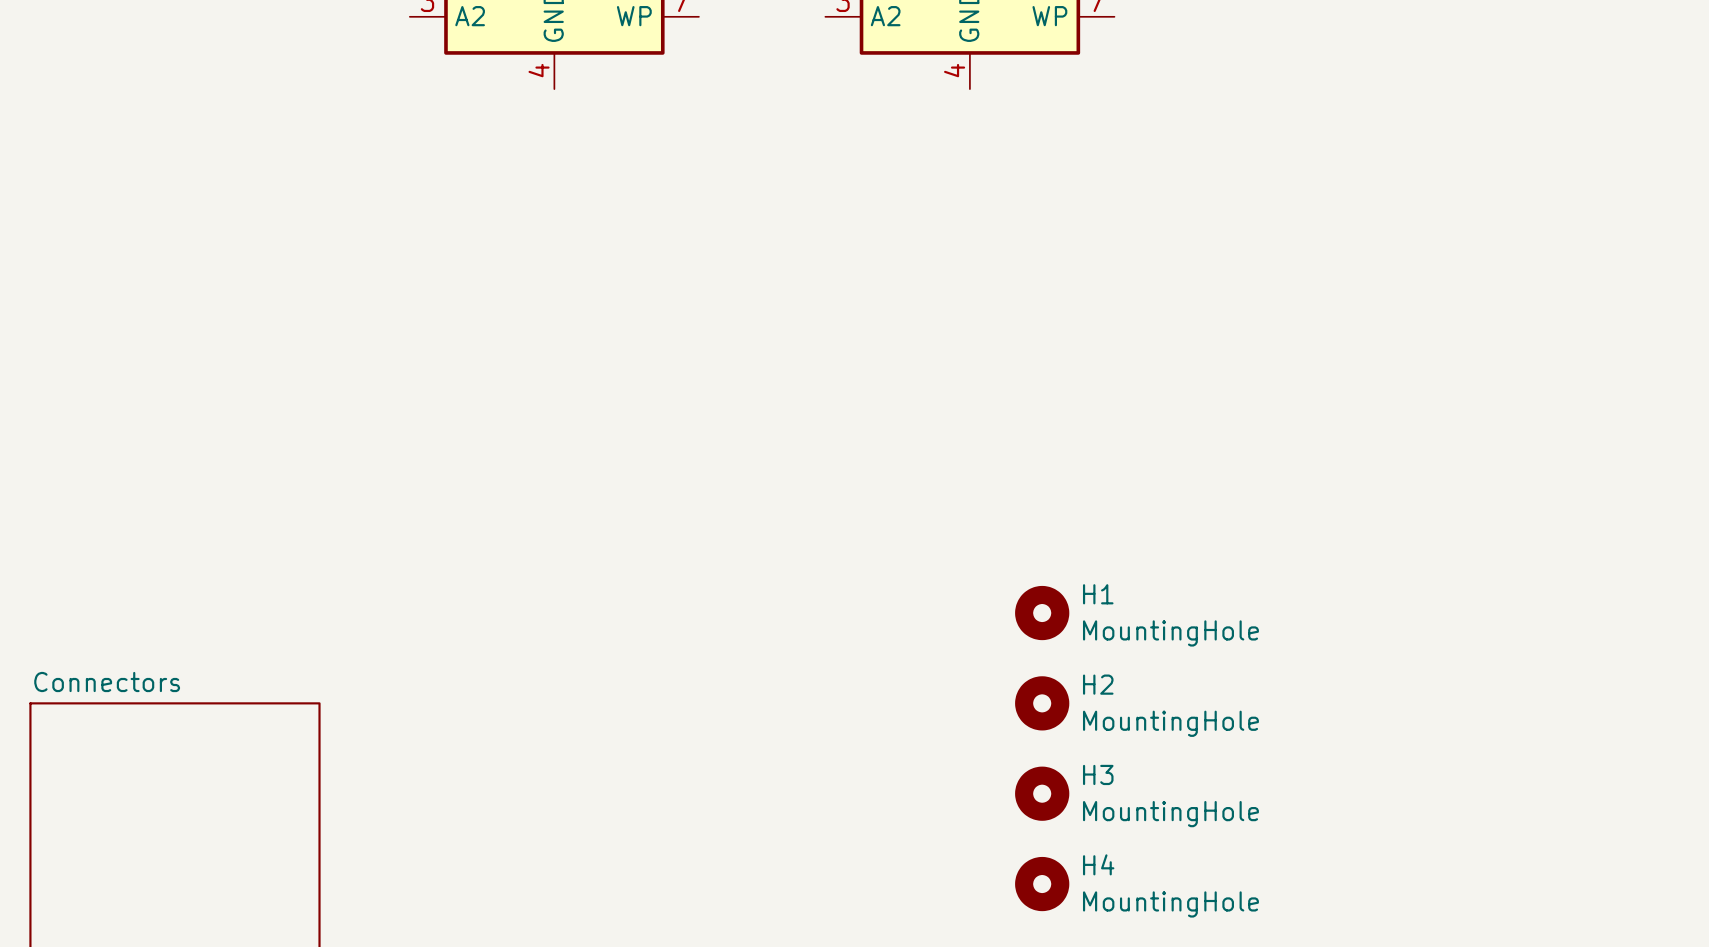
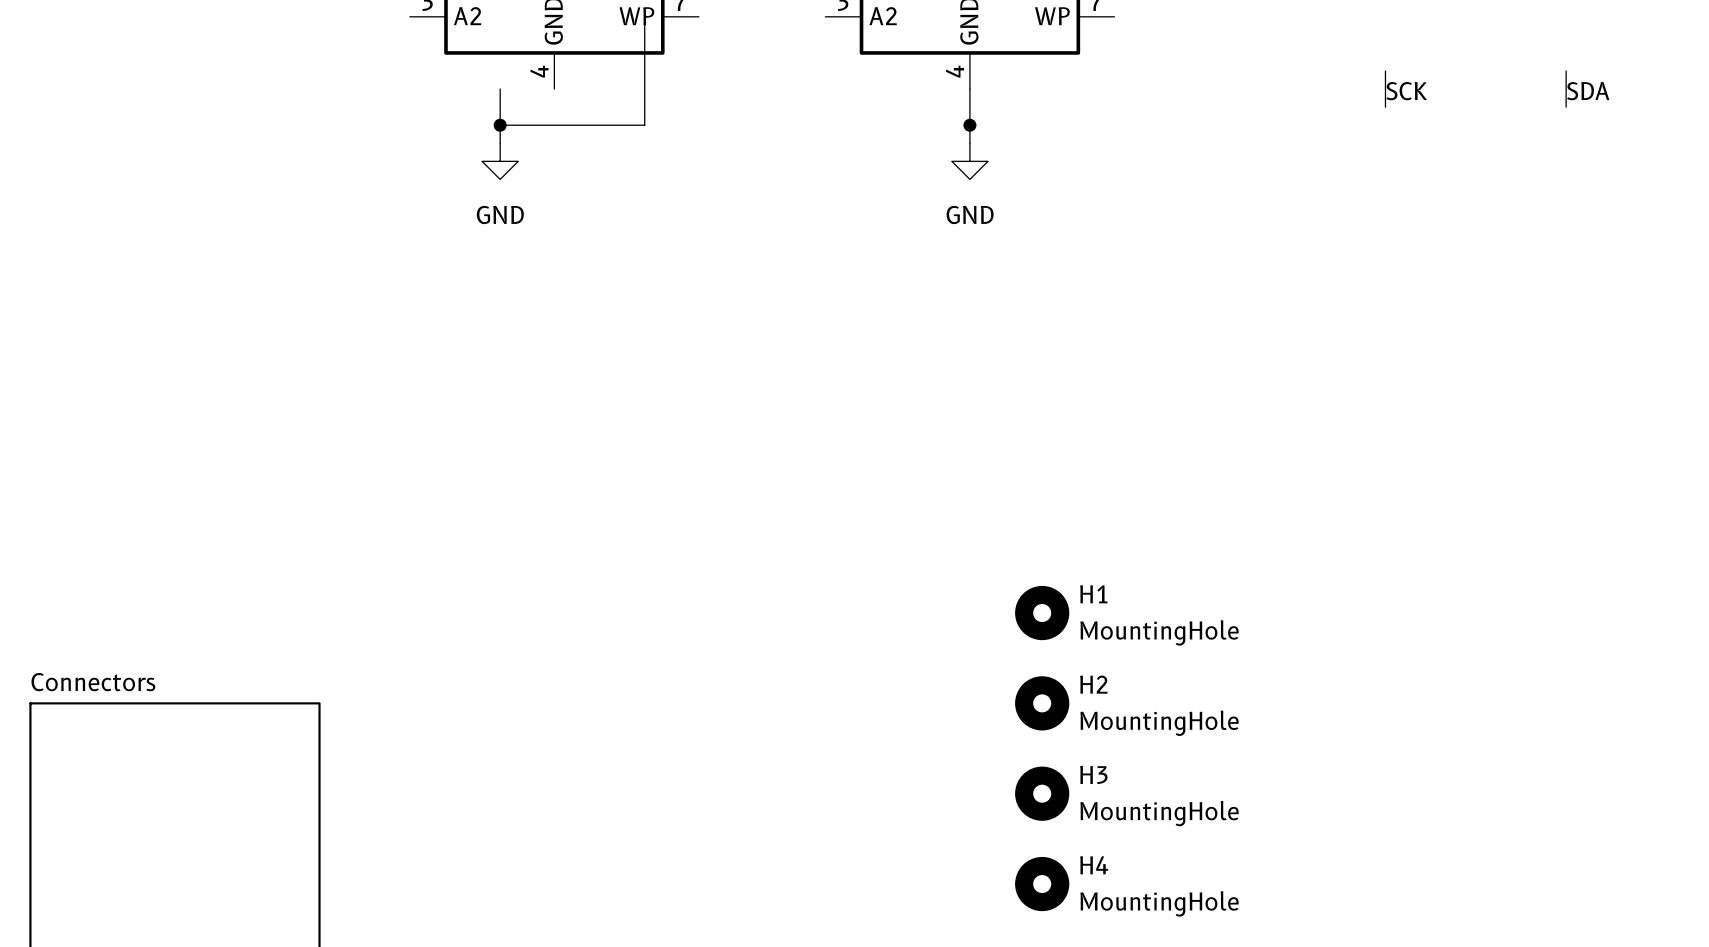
wire: none -> (644, 16) (644, 125) (500, 125)
wire: none -> (1385, 71) (1385, 107)
wire: none -> (1566, 71) (1566, 107)
wire: none -> (500, 89) (500, 143)
wire: none -> (969, 89) (969, 143)
label: none -> SCK (1406, 91)
label: none -> SDA (1588, 91)
junction: none -> (500, 125)
junction: none -> (969, 125)
power symbol: none -> GND (500, 161)
power symbol: none -> GND (969, 161)

